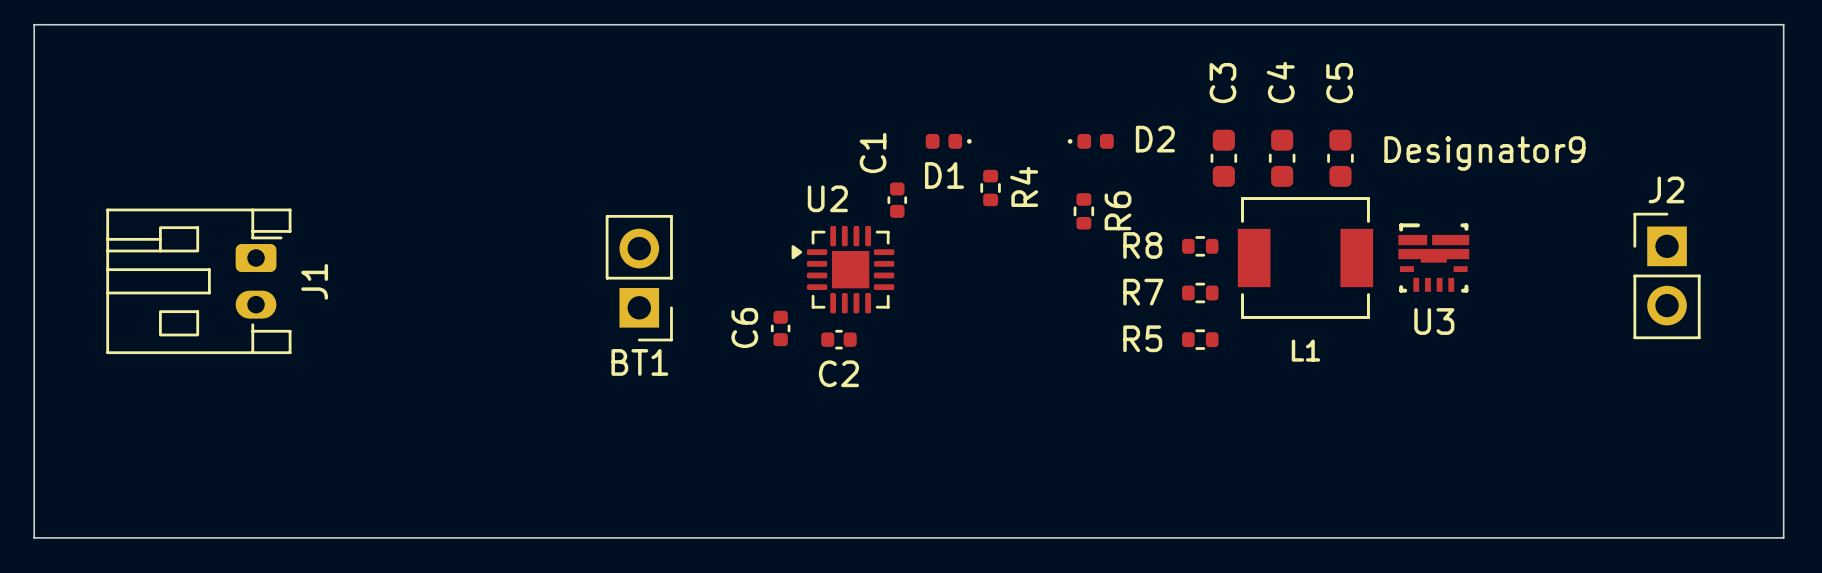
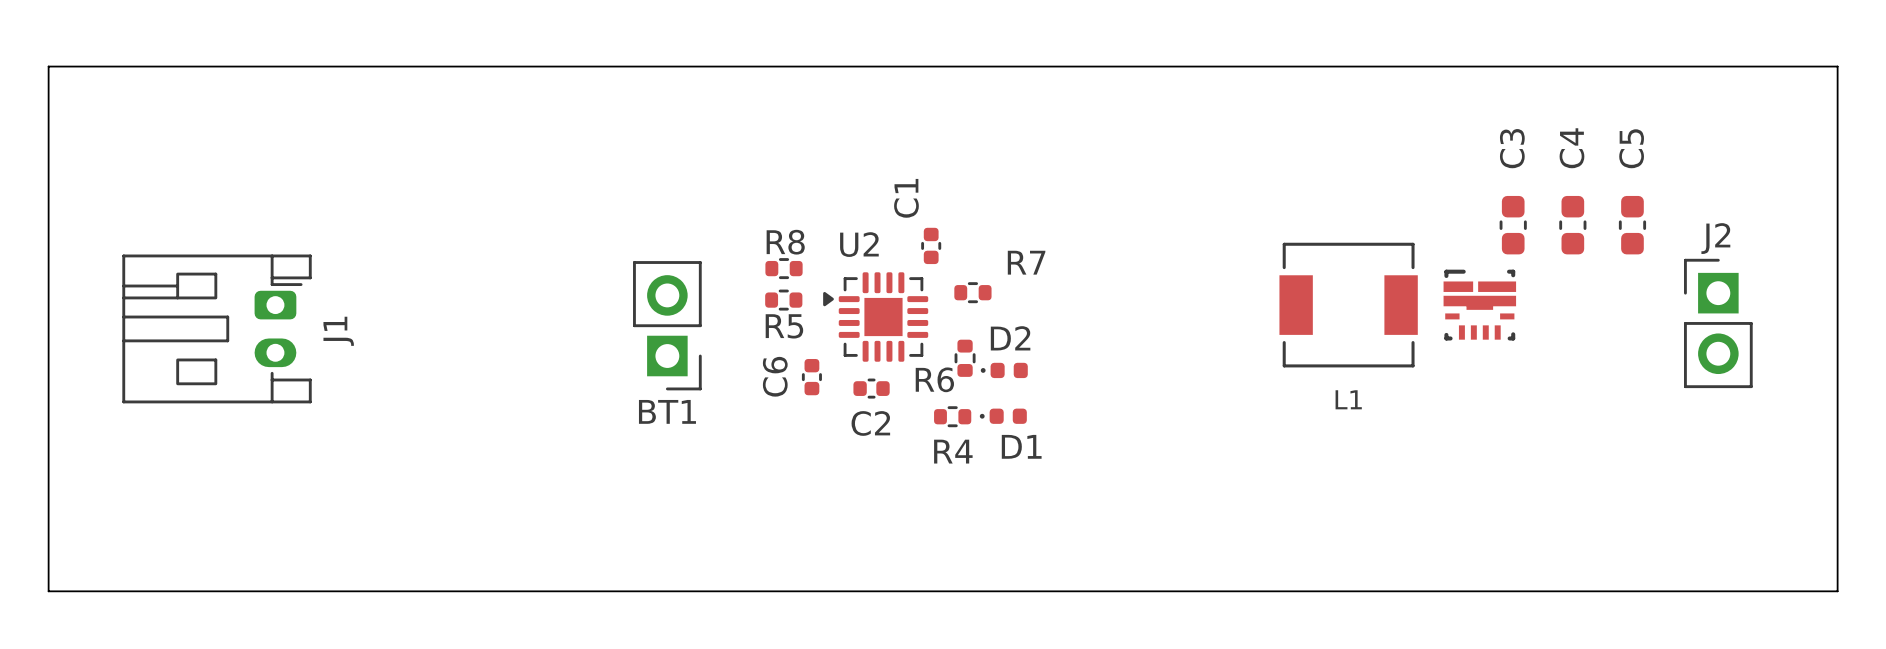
D2 name position: D2 (1155, 139) -> D2 (1010, 338)
D1 rotation: 0° (948, 141) -> 180° (1003, 416)
D1 position: (948, 141) -> (1003, 416)
D2 position: (1090, 141) -> (1004, 370)
U3 text: Designator9 (1484, 153) -> none
C3 position: (1223, 158) -> (1513, 225)
C4 position: (1282, 158) -> (1572, 225)
C5 position: (1340, 158) -> (1632, 225)
R4 rotation: 0° (990, 188) -> 90° clockwise (952, 416)
R4 position: (990, 188) -> (952, 416)
R6 name rotation: 0° (1118, 210) -> 90° clockwise (934, 379)
R6 name position: R6 (1118, 210) -> R6 (934, 379)
R6 position: (1083, 211) -> (965, 358)
R8 name position: R8 (1142, 245) -> R8 (785, 242)
R8 position: (1200, 246) -> (784, 268)
R7 name position: R7 (1143, 292) -> R7 (1026, 262)
R7 position: (1200, 292) -> (972, 292)
U3 name: U3 (1434, 321) -> none
R5 name position: R5 (1142, 338) -> R5 (784, 326)
R5 position: (1200, 339) -> (783, 300)

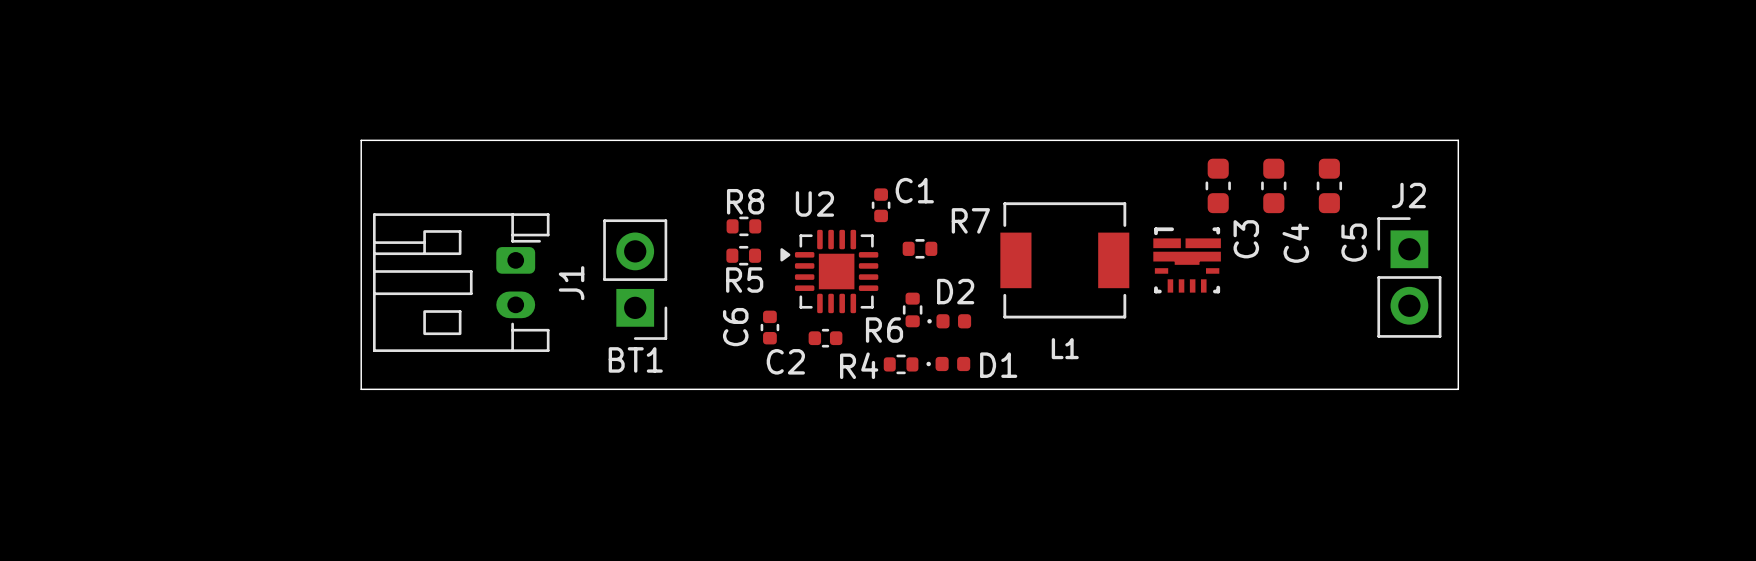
board edge: (48, 66) (1837, 66) (1837, 591) (48, 591) (48, 66) -> none
C3 name position: C3 (1512, 148) -> C3 (1246, 239)
C4 name position: C4 (1571, 148) -> C4 (1295, 243)
C5 name position: C5 (1631, 148) -> C5 (1354, 242)
board edge: none -> (361, 140) (1458, 140) (1458, 389) (361, 389) (361, 140)
C1 name rotation: 0° (906, 198) -> 90° clockwise (914, 190)
C1 name position: C1 (906, 198) -> C1 (914, 190)
C3 position: (1513, 225) -> (1218, 185)
C4 position: (1572, 225) -> (1273, 185)
C5 position: (1632, 225) -> (1329, 185)
L1 position: (1348, 305) -> (1064, 260)
part position: (1479, 305) -> (1187, 260)
J2 position: (1718, 323) -> (1409, 277)
J1 position: (217, 328) -> (461, 282)
C2 name position: C2 (870, 423) -> C2 (785, 361)
D1 name position: D1 (1021, 446) -> D1 (998, 365)
R4 name position: R4 (953, 451) -> R4 (859, 365)

